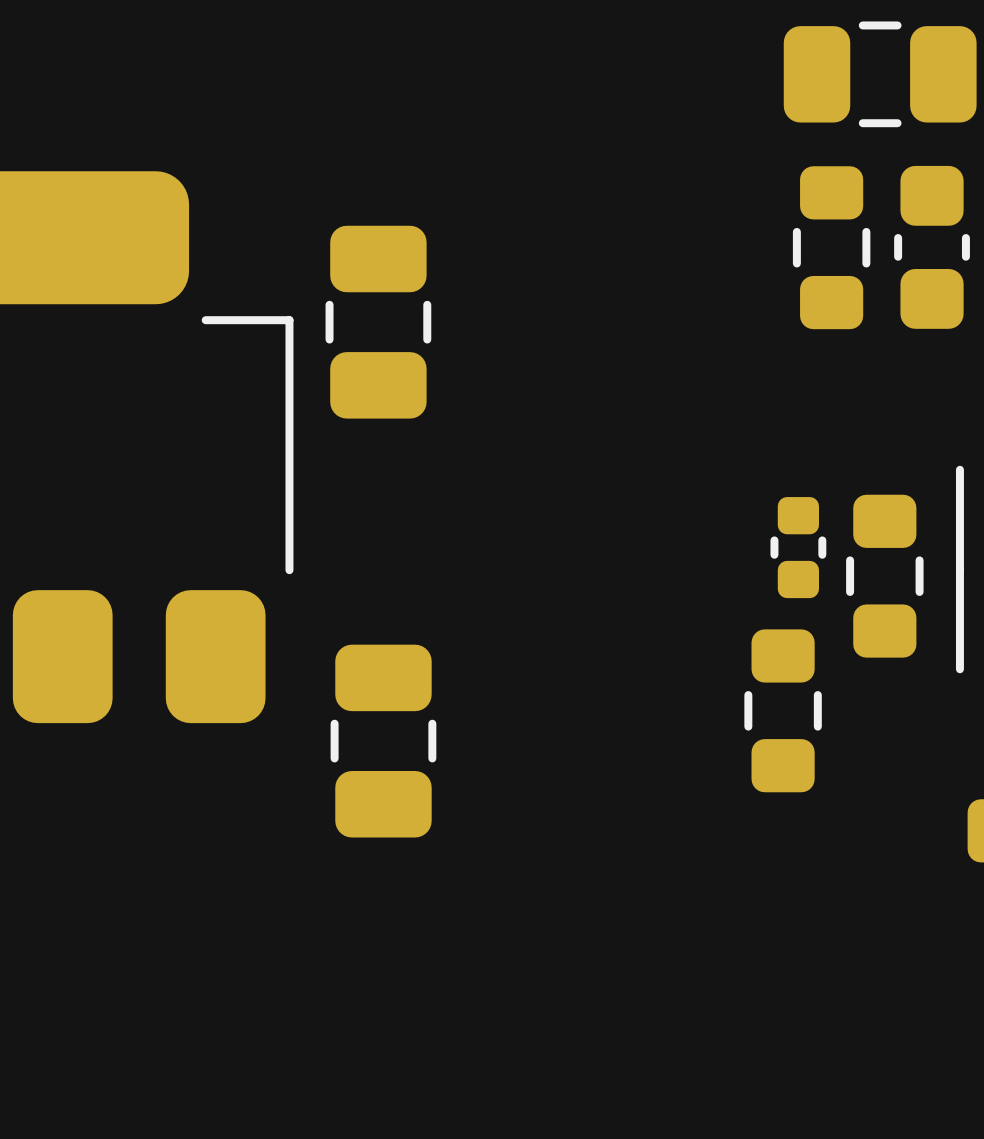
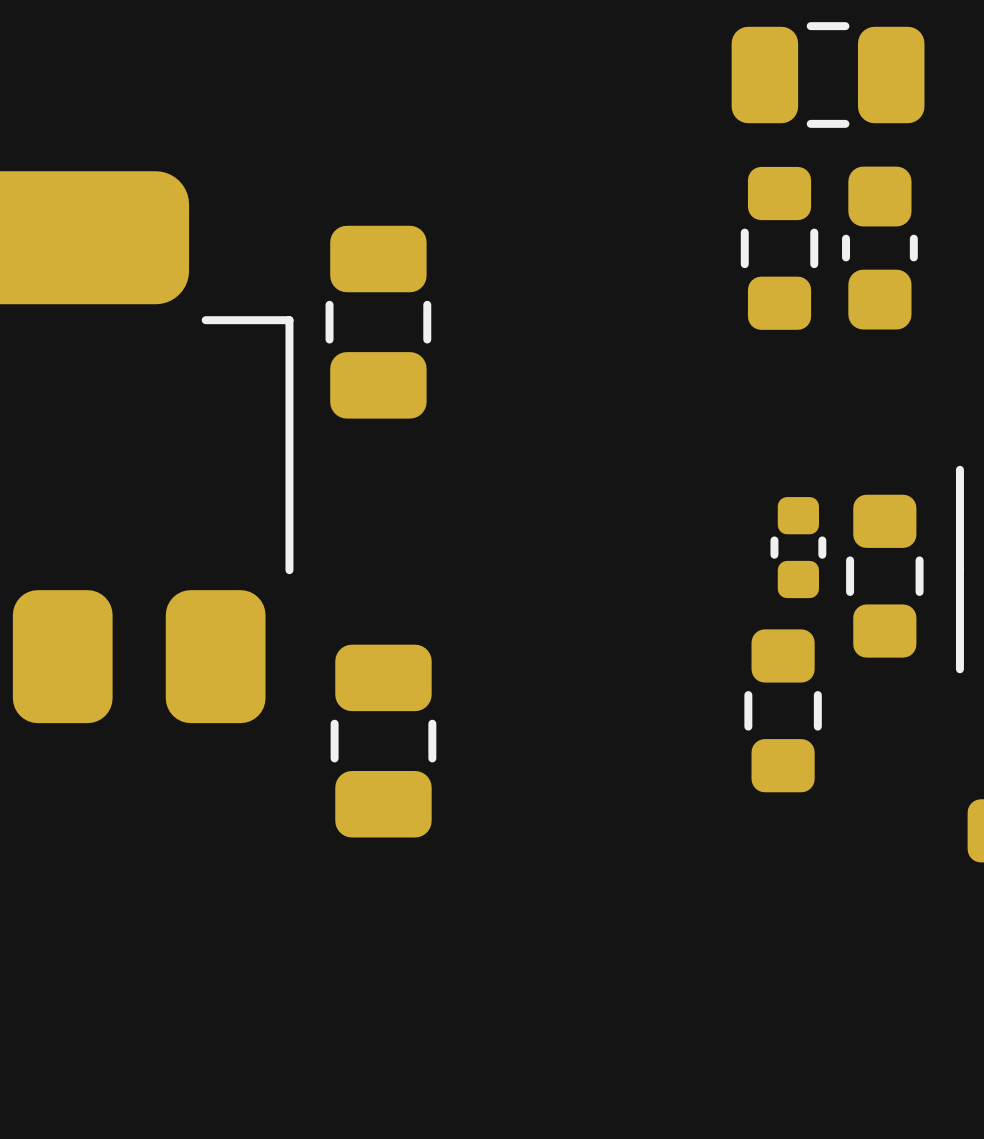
part position: (880, 74) -> (828, 75)
part position: (831, 247) -> (779, 248)
part position: (932, 247) -> (879, 248)

